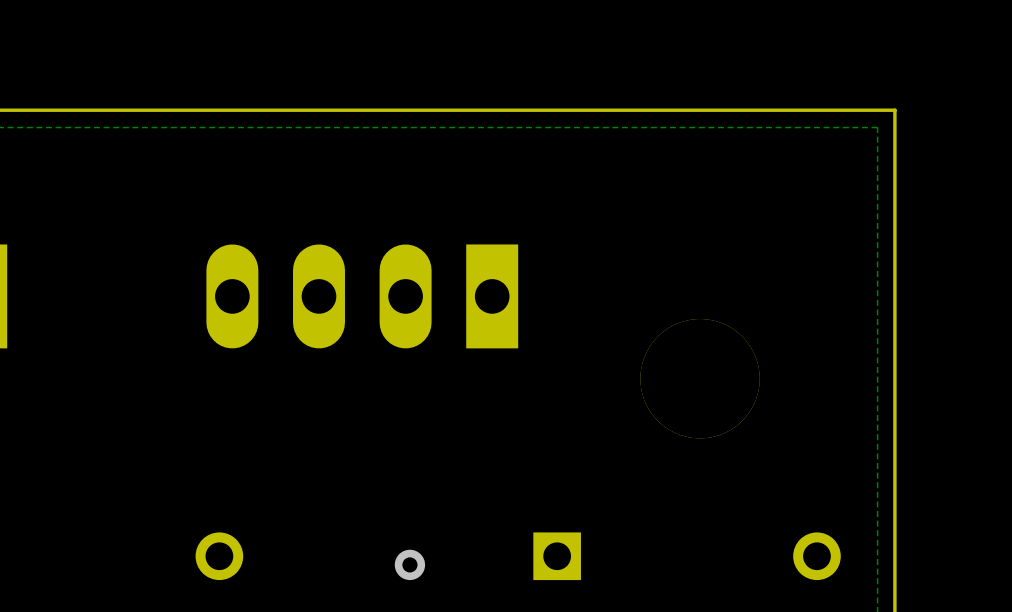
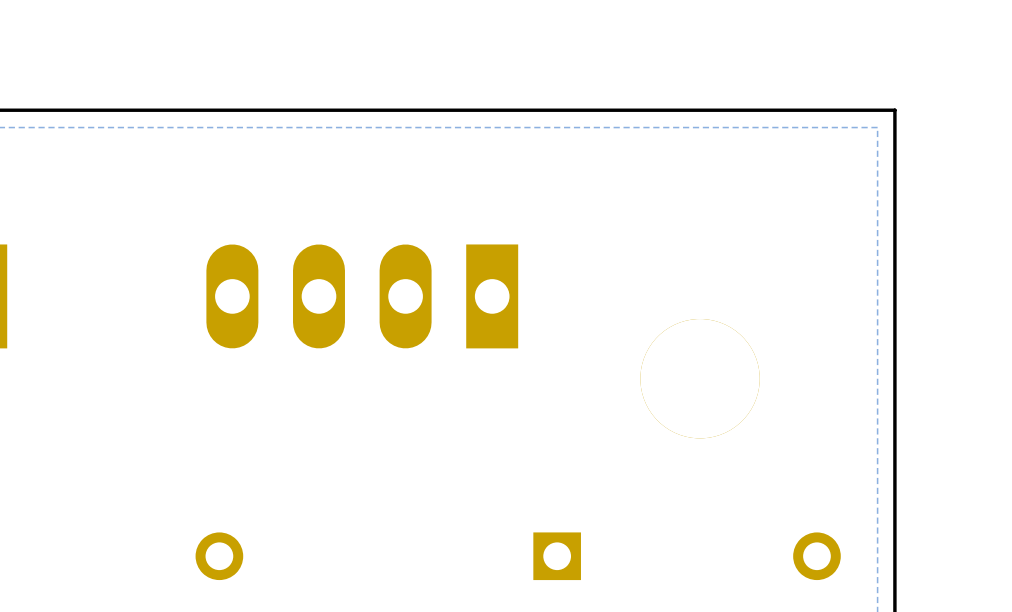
via: (409, 564) -> none

